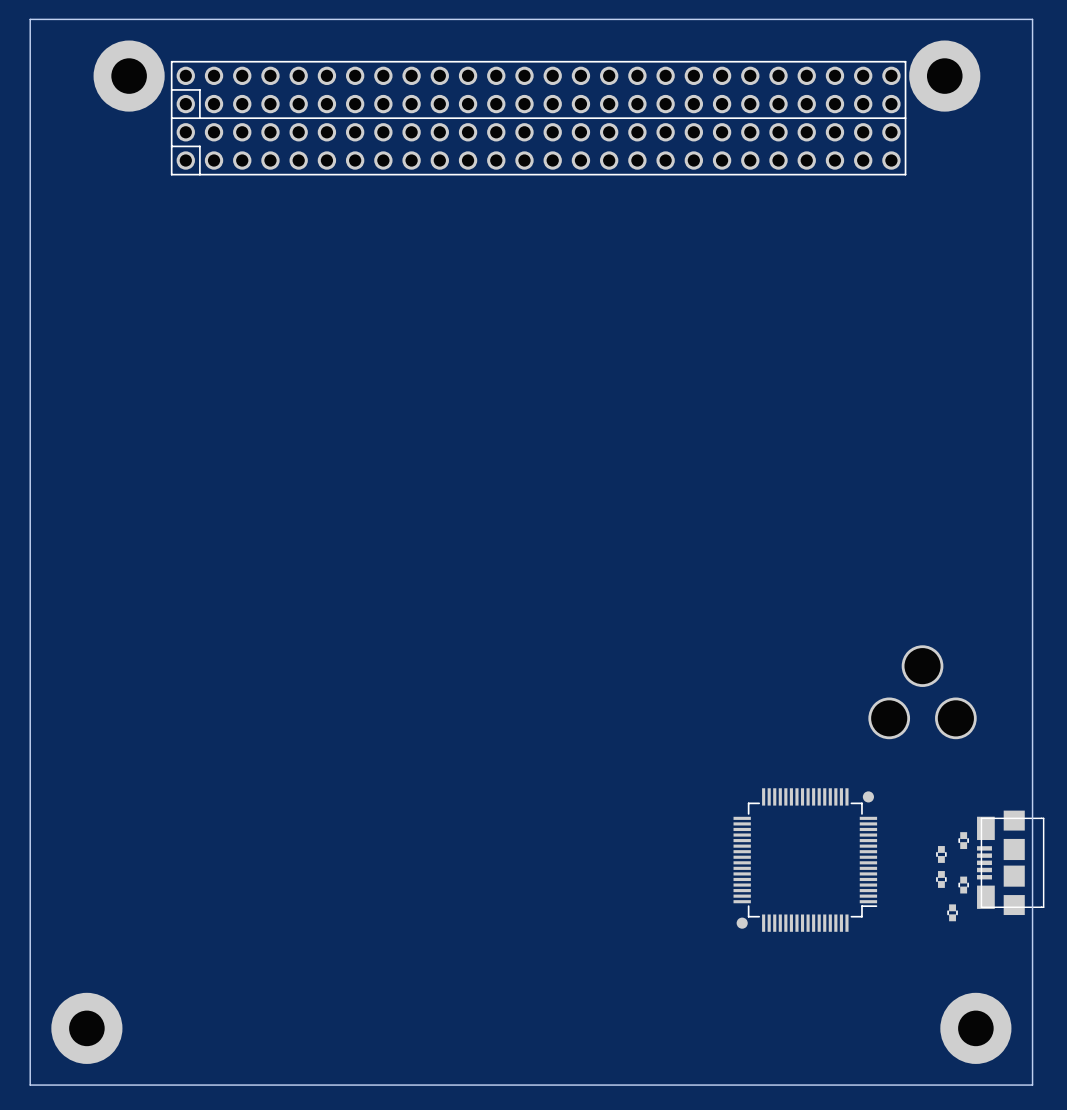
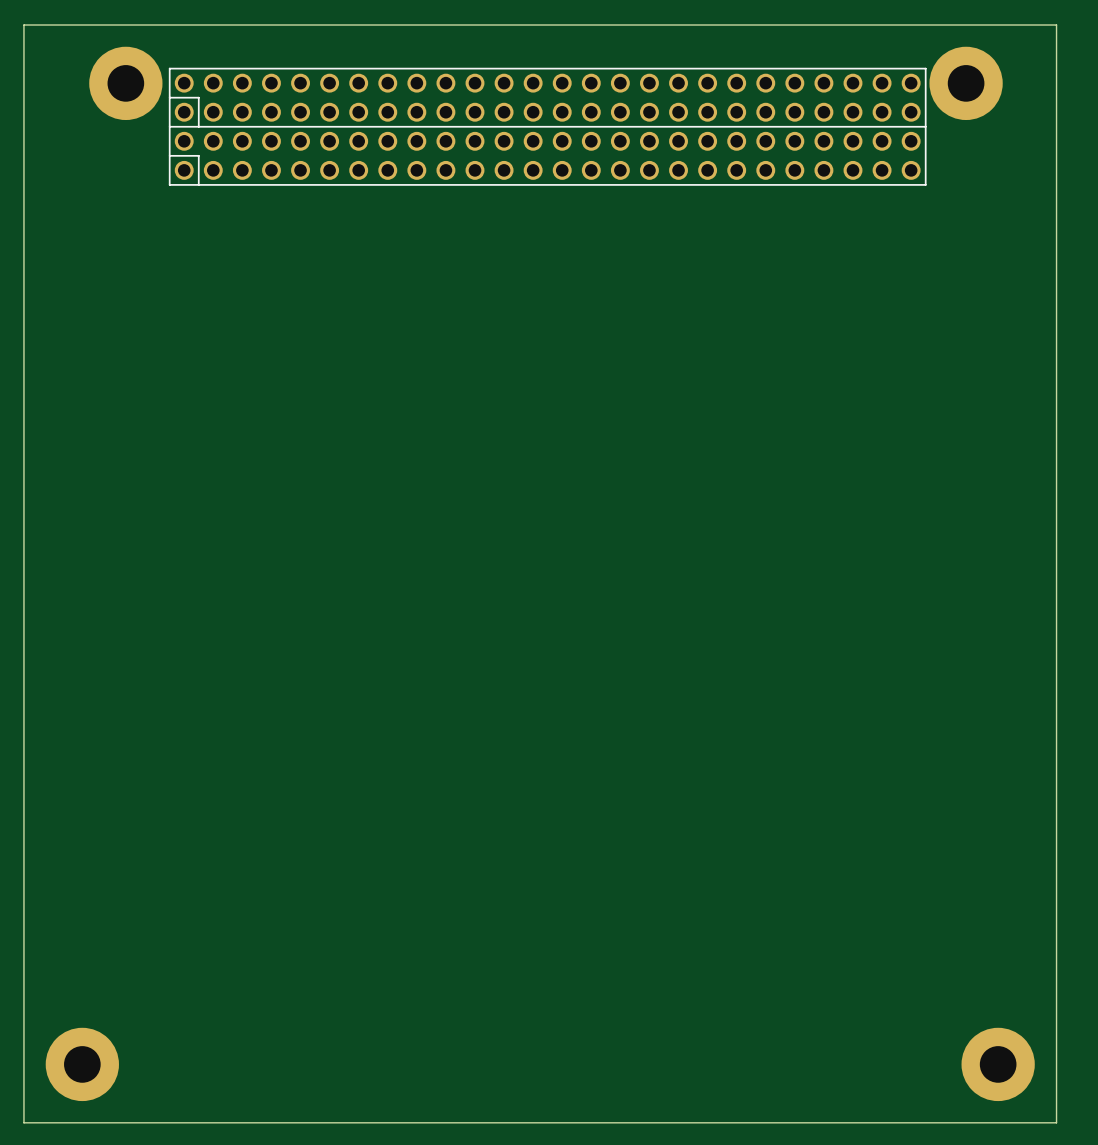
part: (922, 692) -> none
part: (963, 840) -> none
part: (941, 854) -> none
part: (805, 860) -> none
part: (1010, 862) -> none
part: (941, 879) -> none
part: (963, 885) -> none
part: (952, 912) -> none

